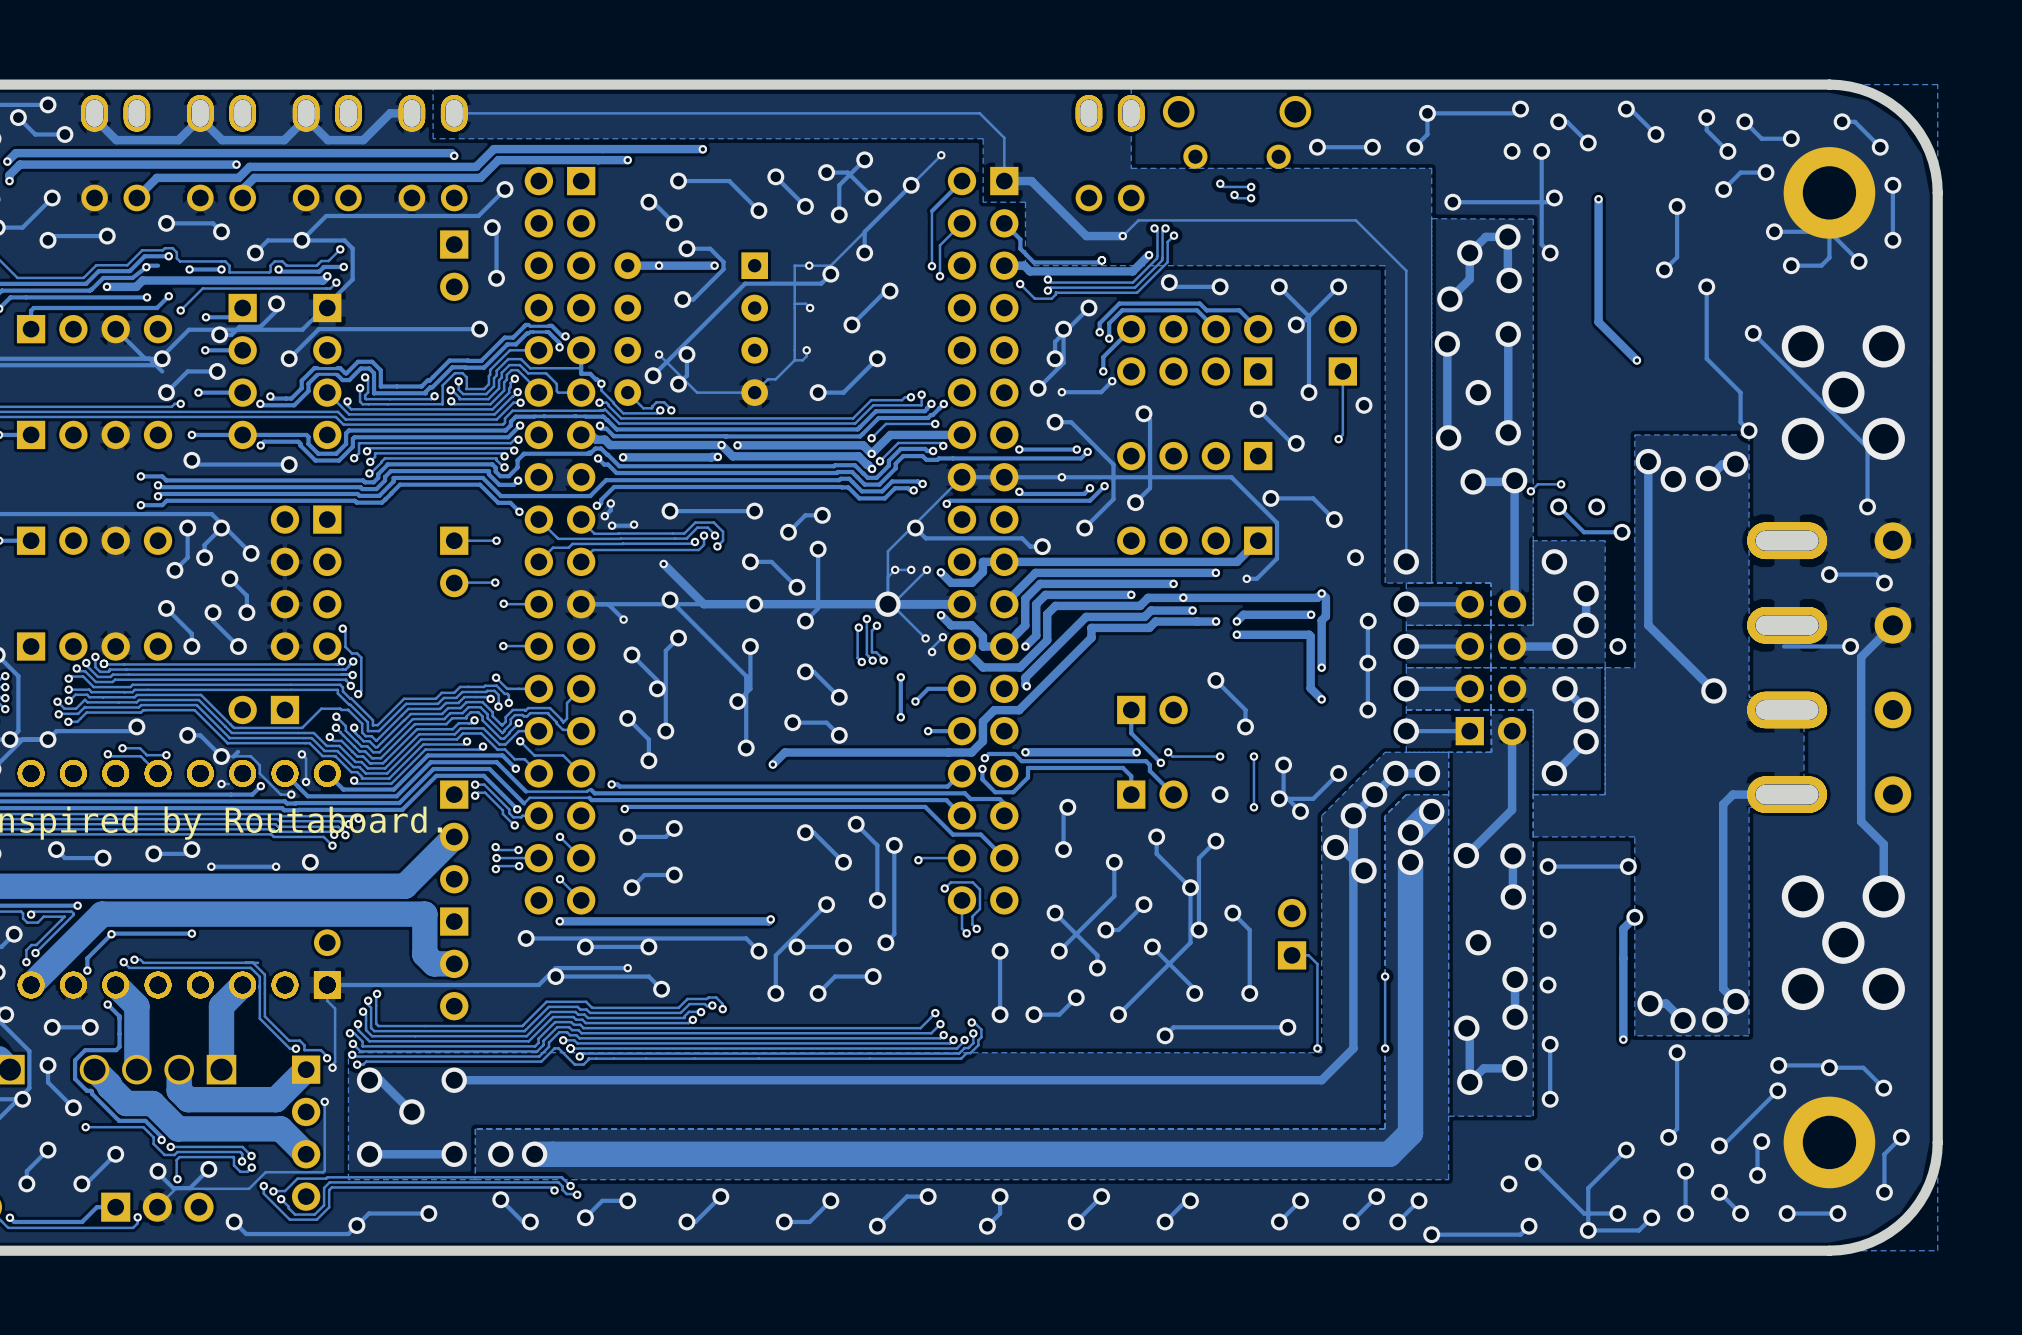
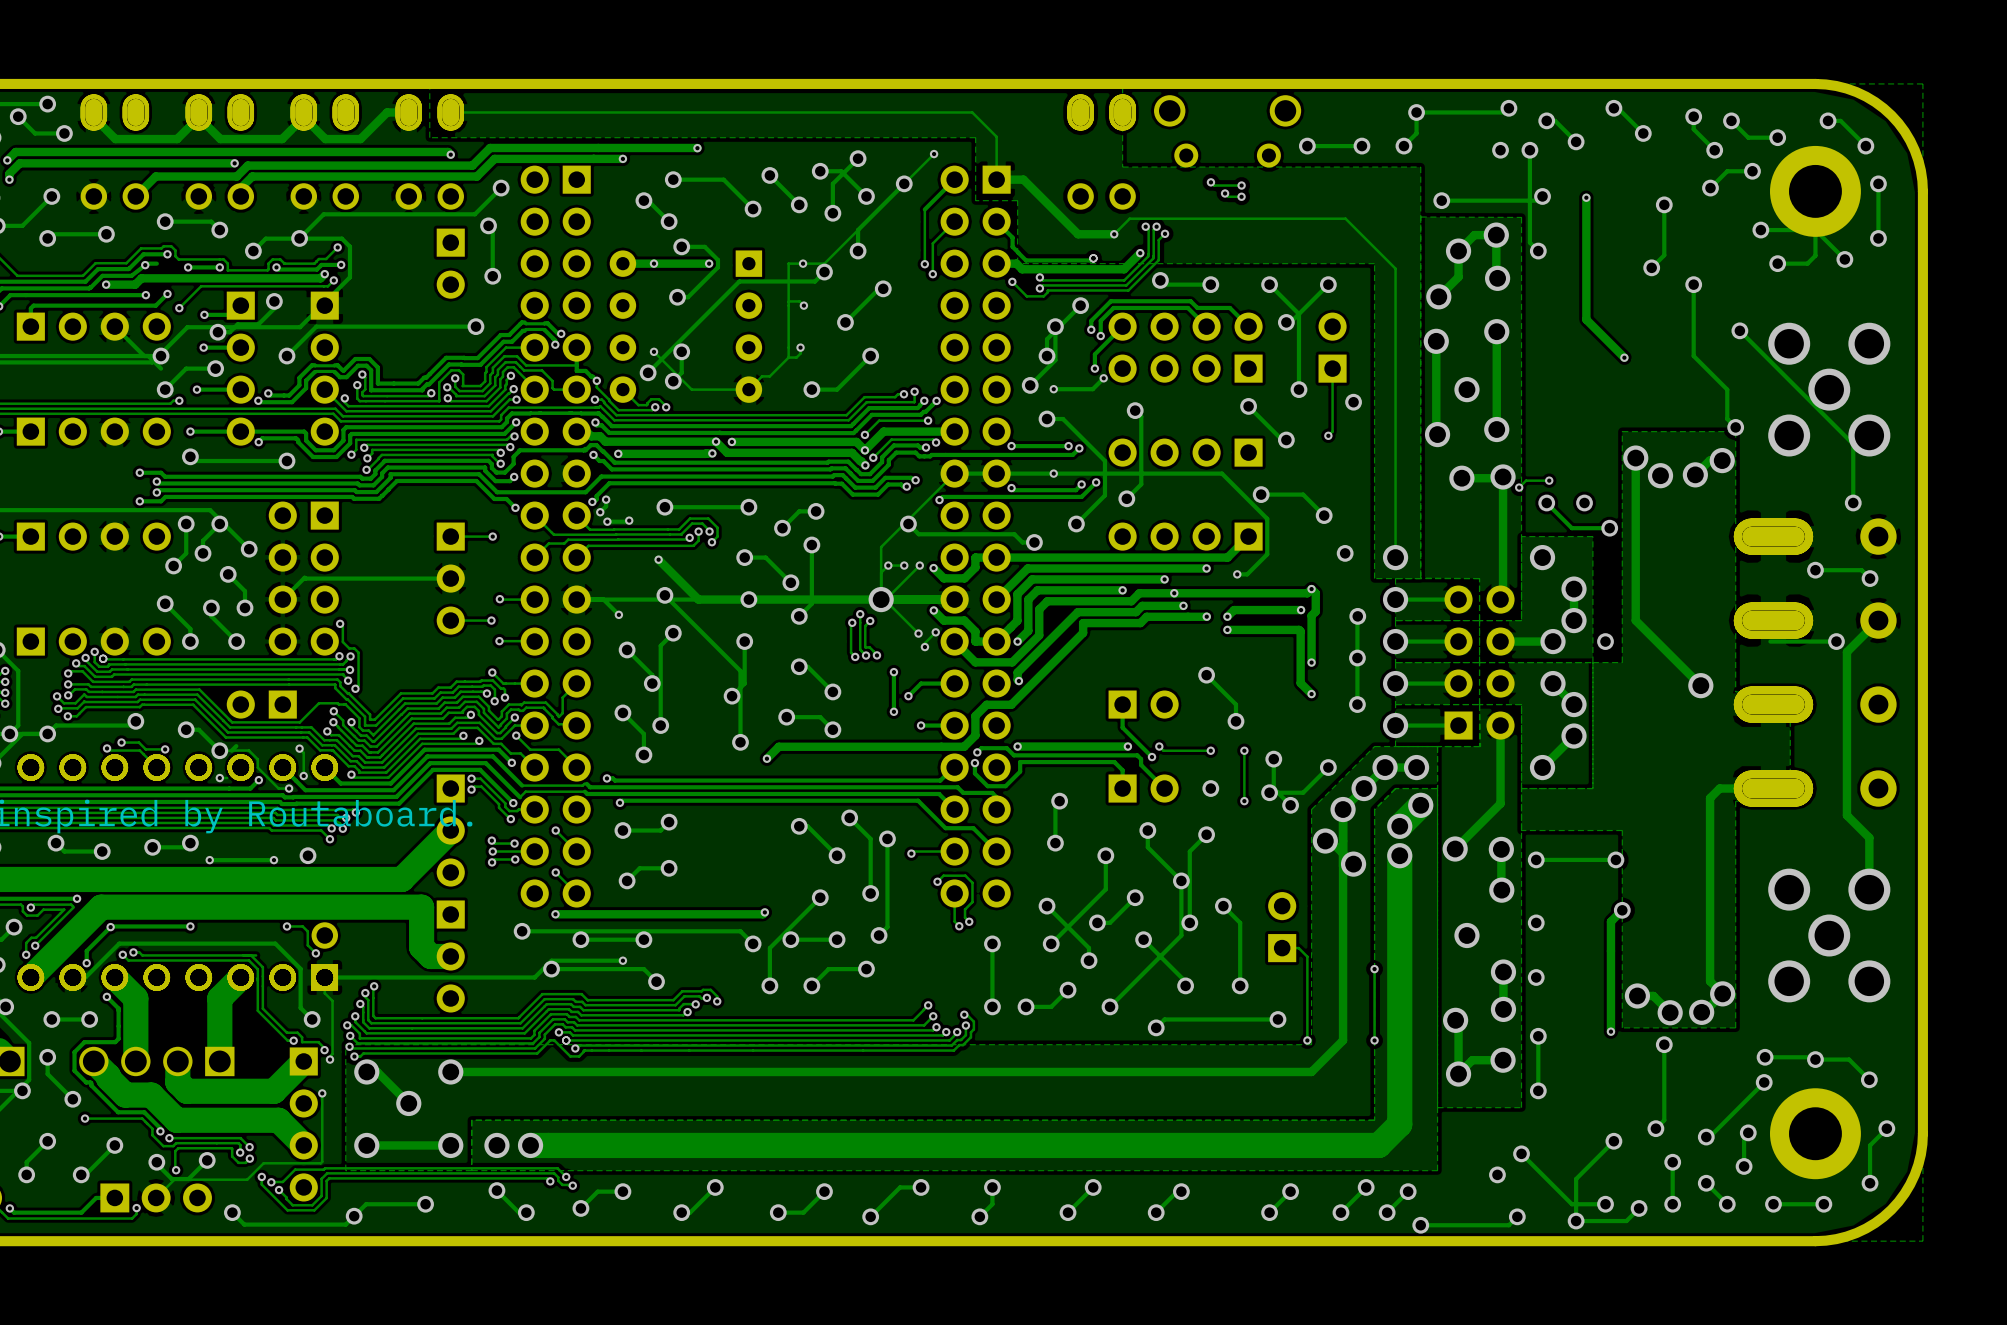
part: (454, 561) -> none
track: (495, 582) (454, 583) -> (282, 599) (304, 577) (450, 578)
via position: (495, 582) -> (491, 620)
part: none -> (450, 578)
track: none -> (491, 620) (450, 620)
track: none -> (286, 926) (302, 926) (307, 931) (307, 945) (315, 953)
via: none -> (286, 926)
via: none -> (315, 953)
track: none -> (72, 977) (85, 977) (119, 943) (275, 943) (300, 968) (300, 1007) (312, 1019)
via: none -> (312, 1019)

